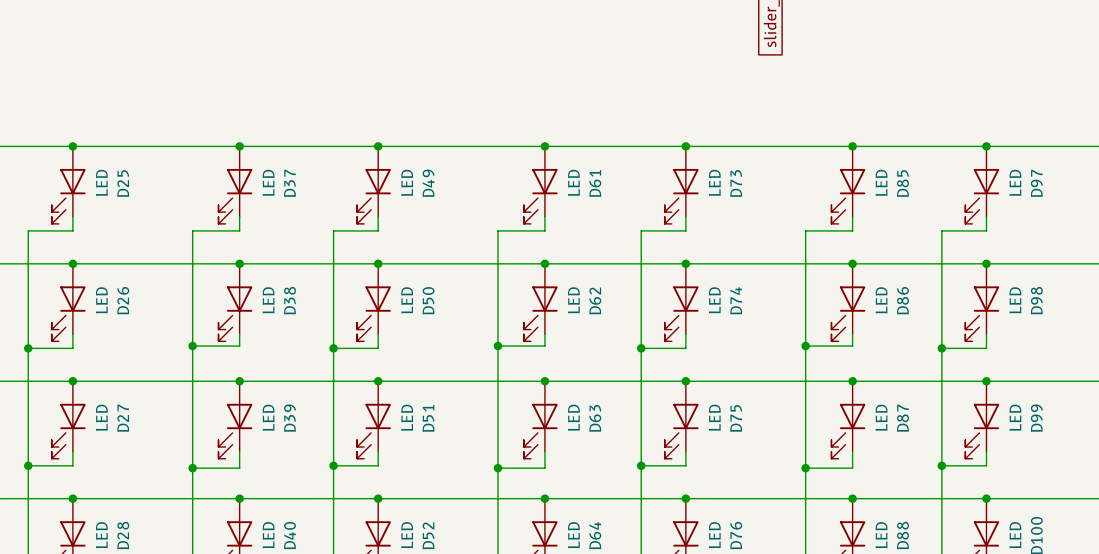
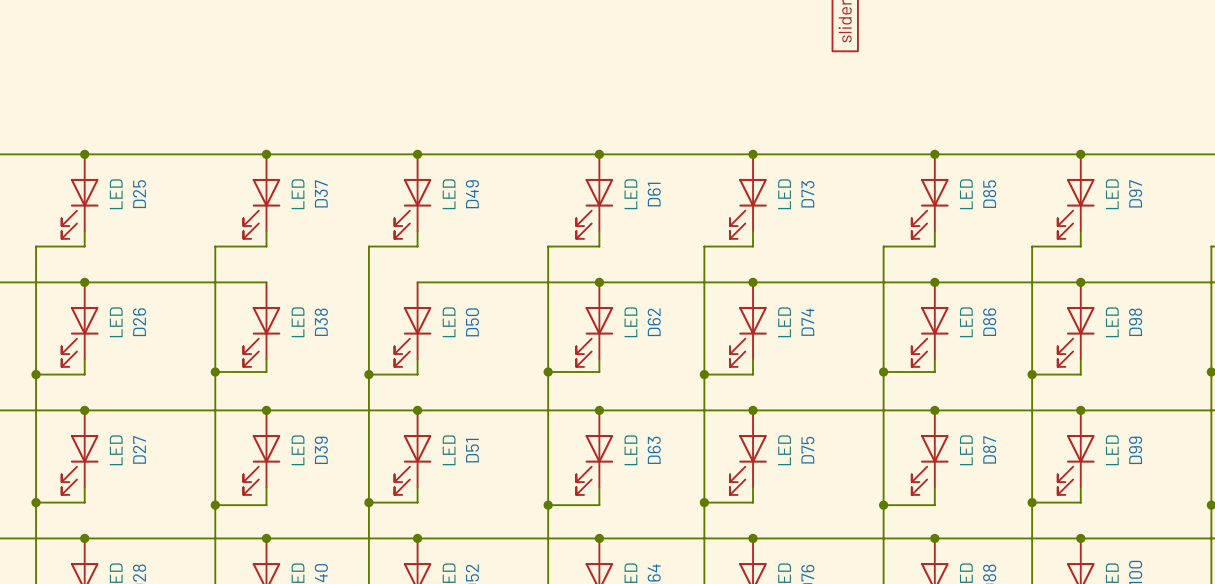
wire: (239, 263) (378, 263) -> none
junction: (239, 263) -> none
junction: (378, 263) -> none

